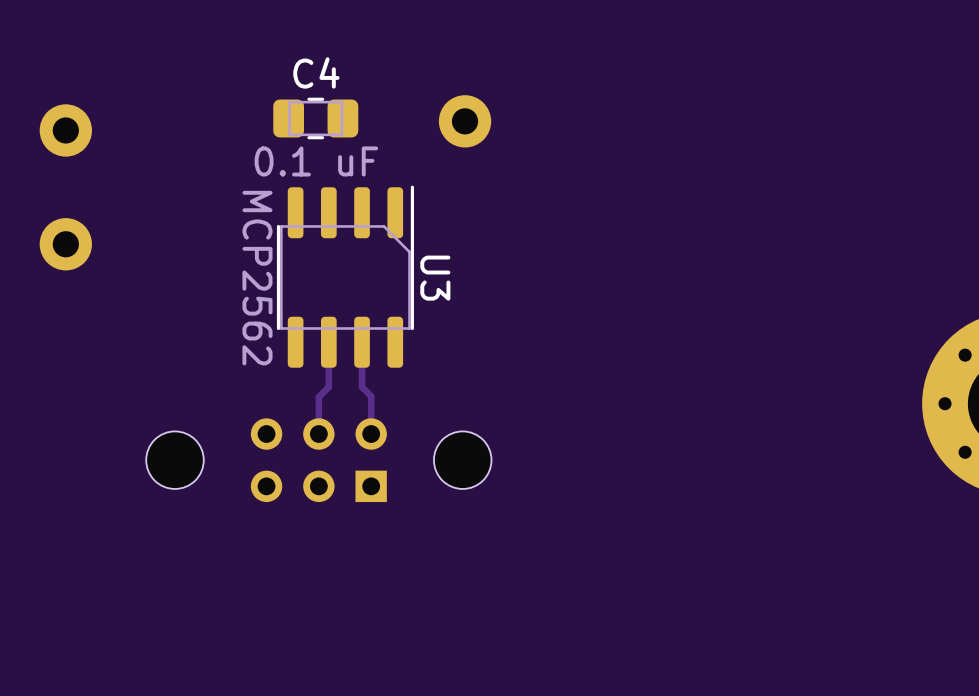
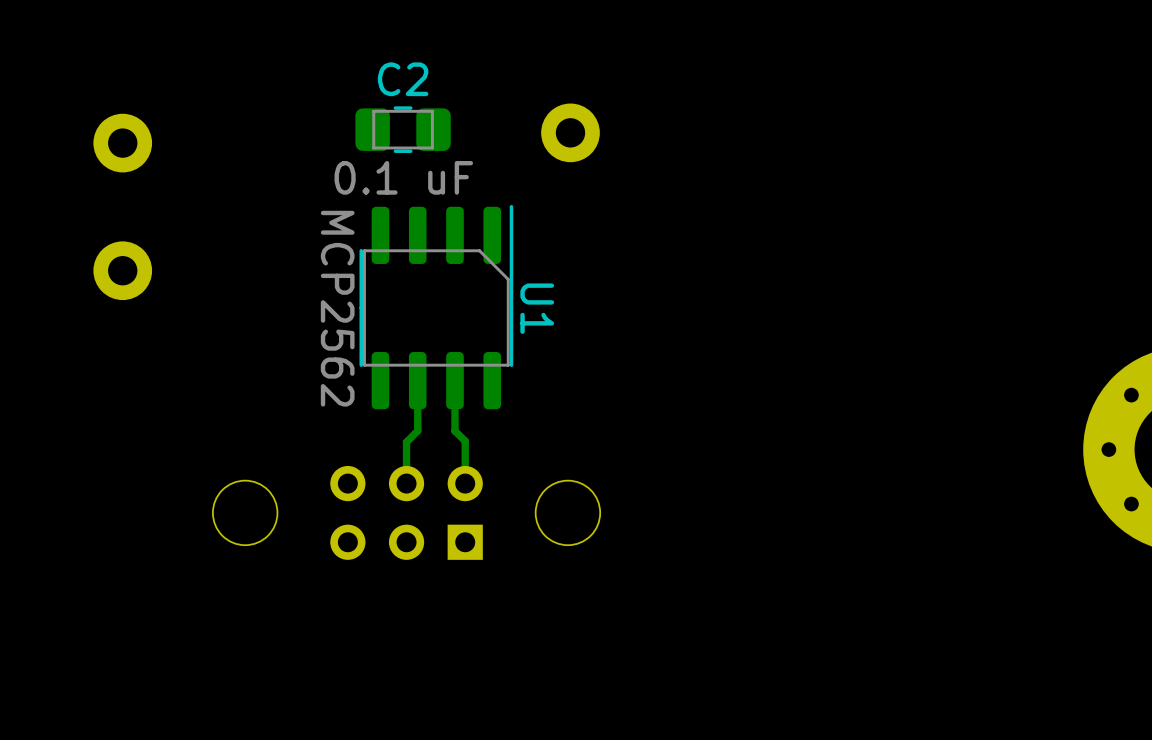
C4 name: C4 (316, 72) -> C2 (403, 79)
U3 name: U3 (435, 278) -> U1 (537, 308)

